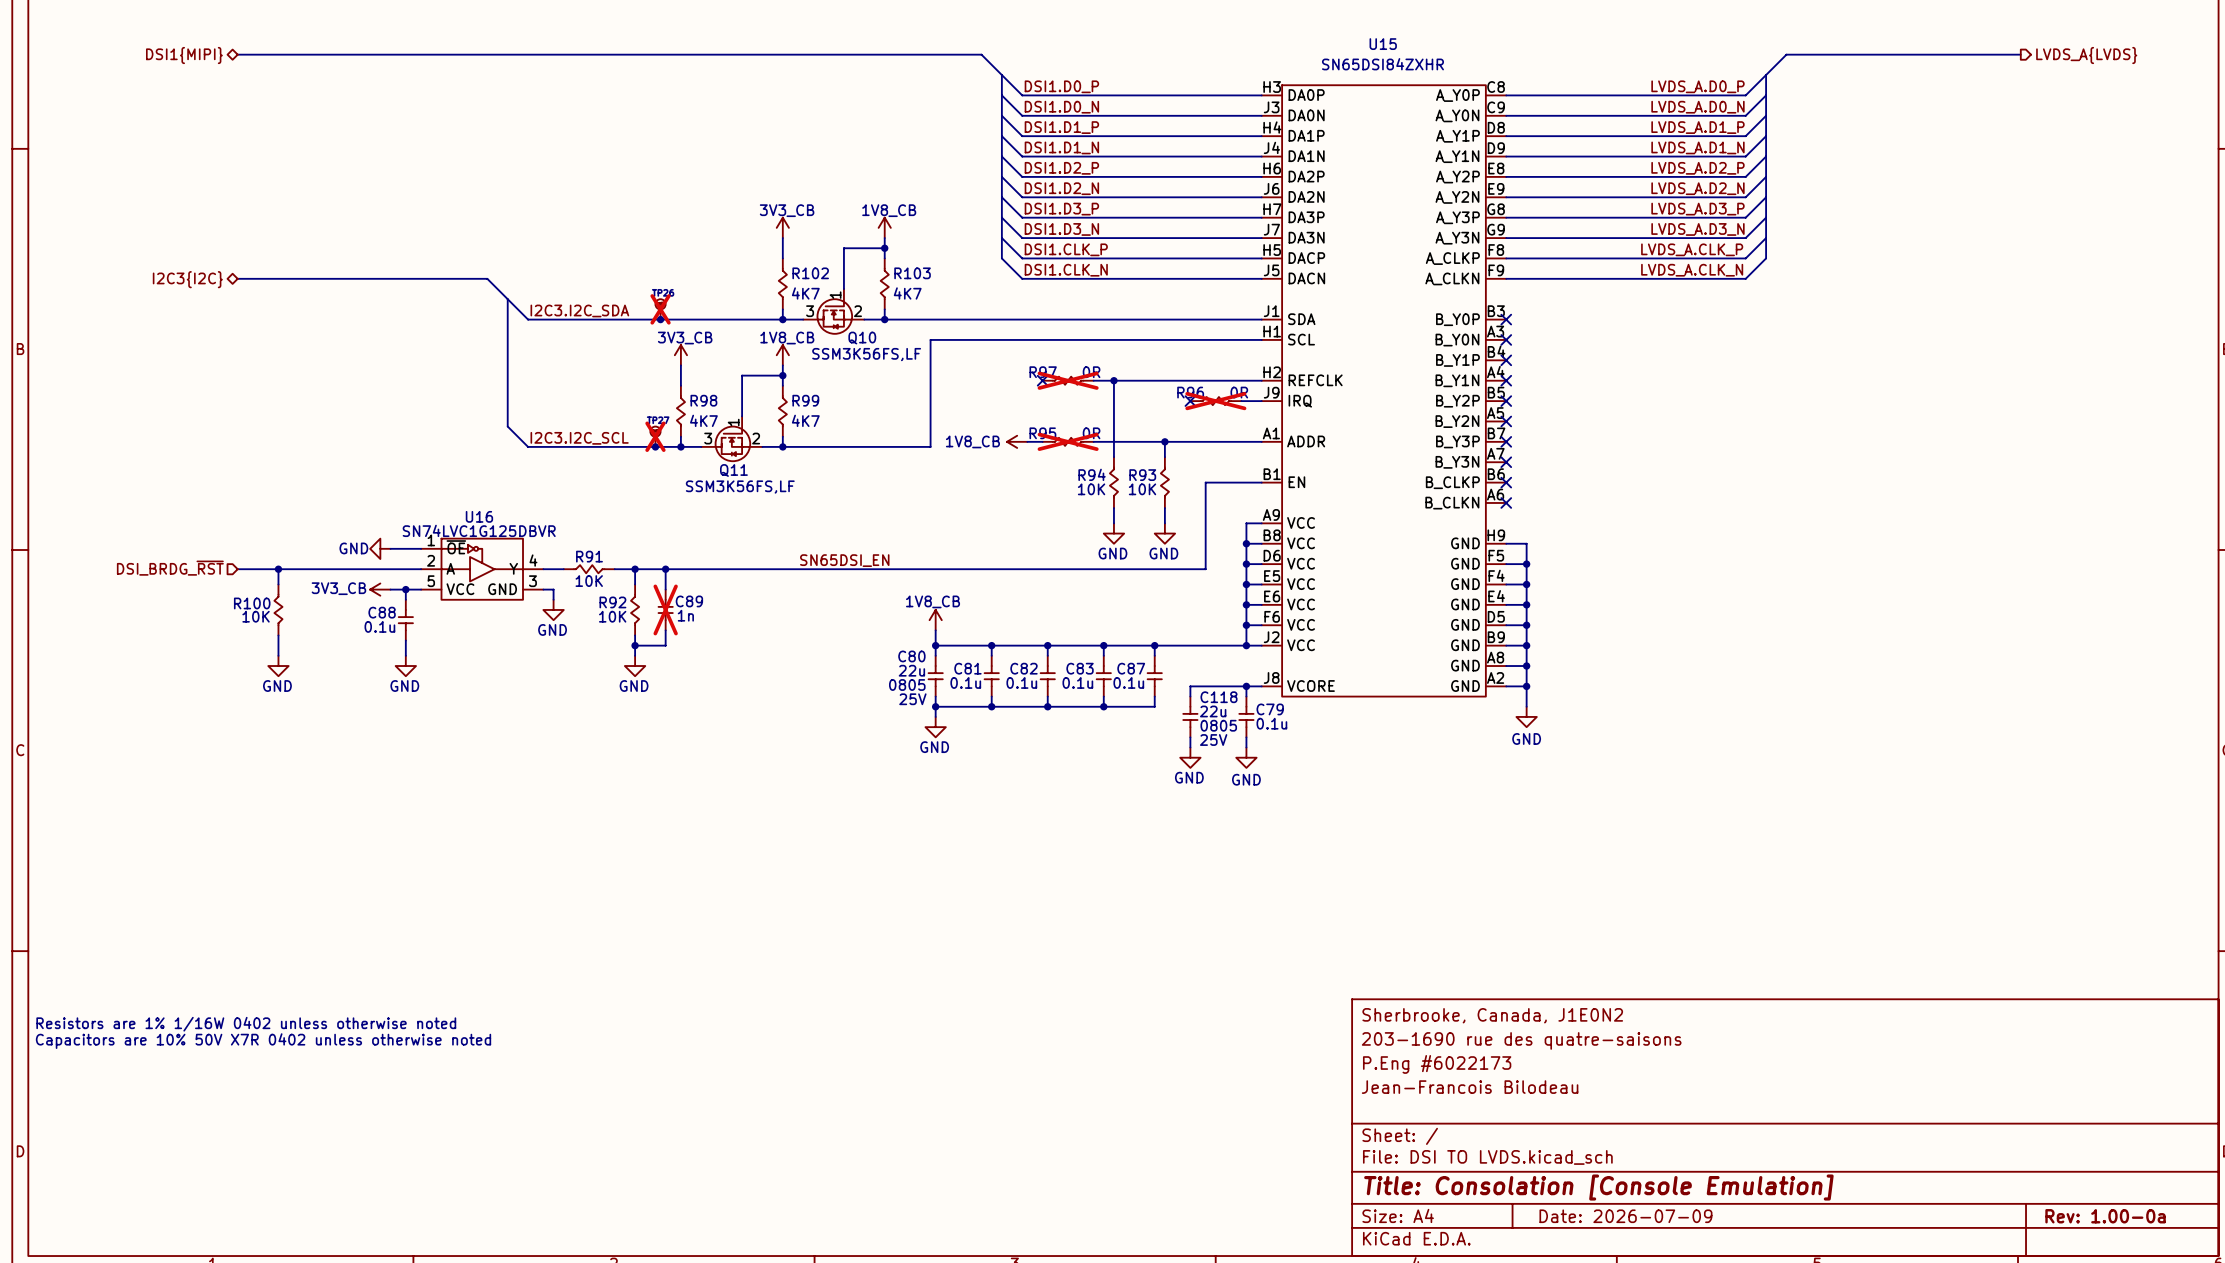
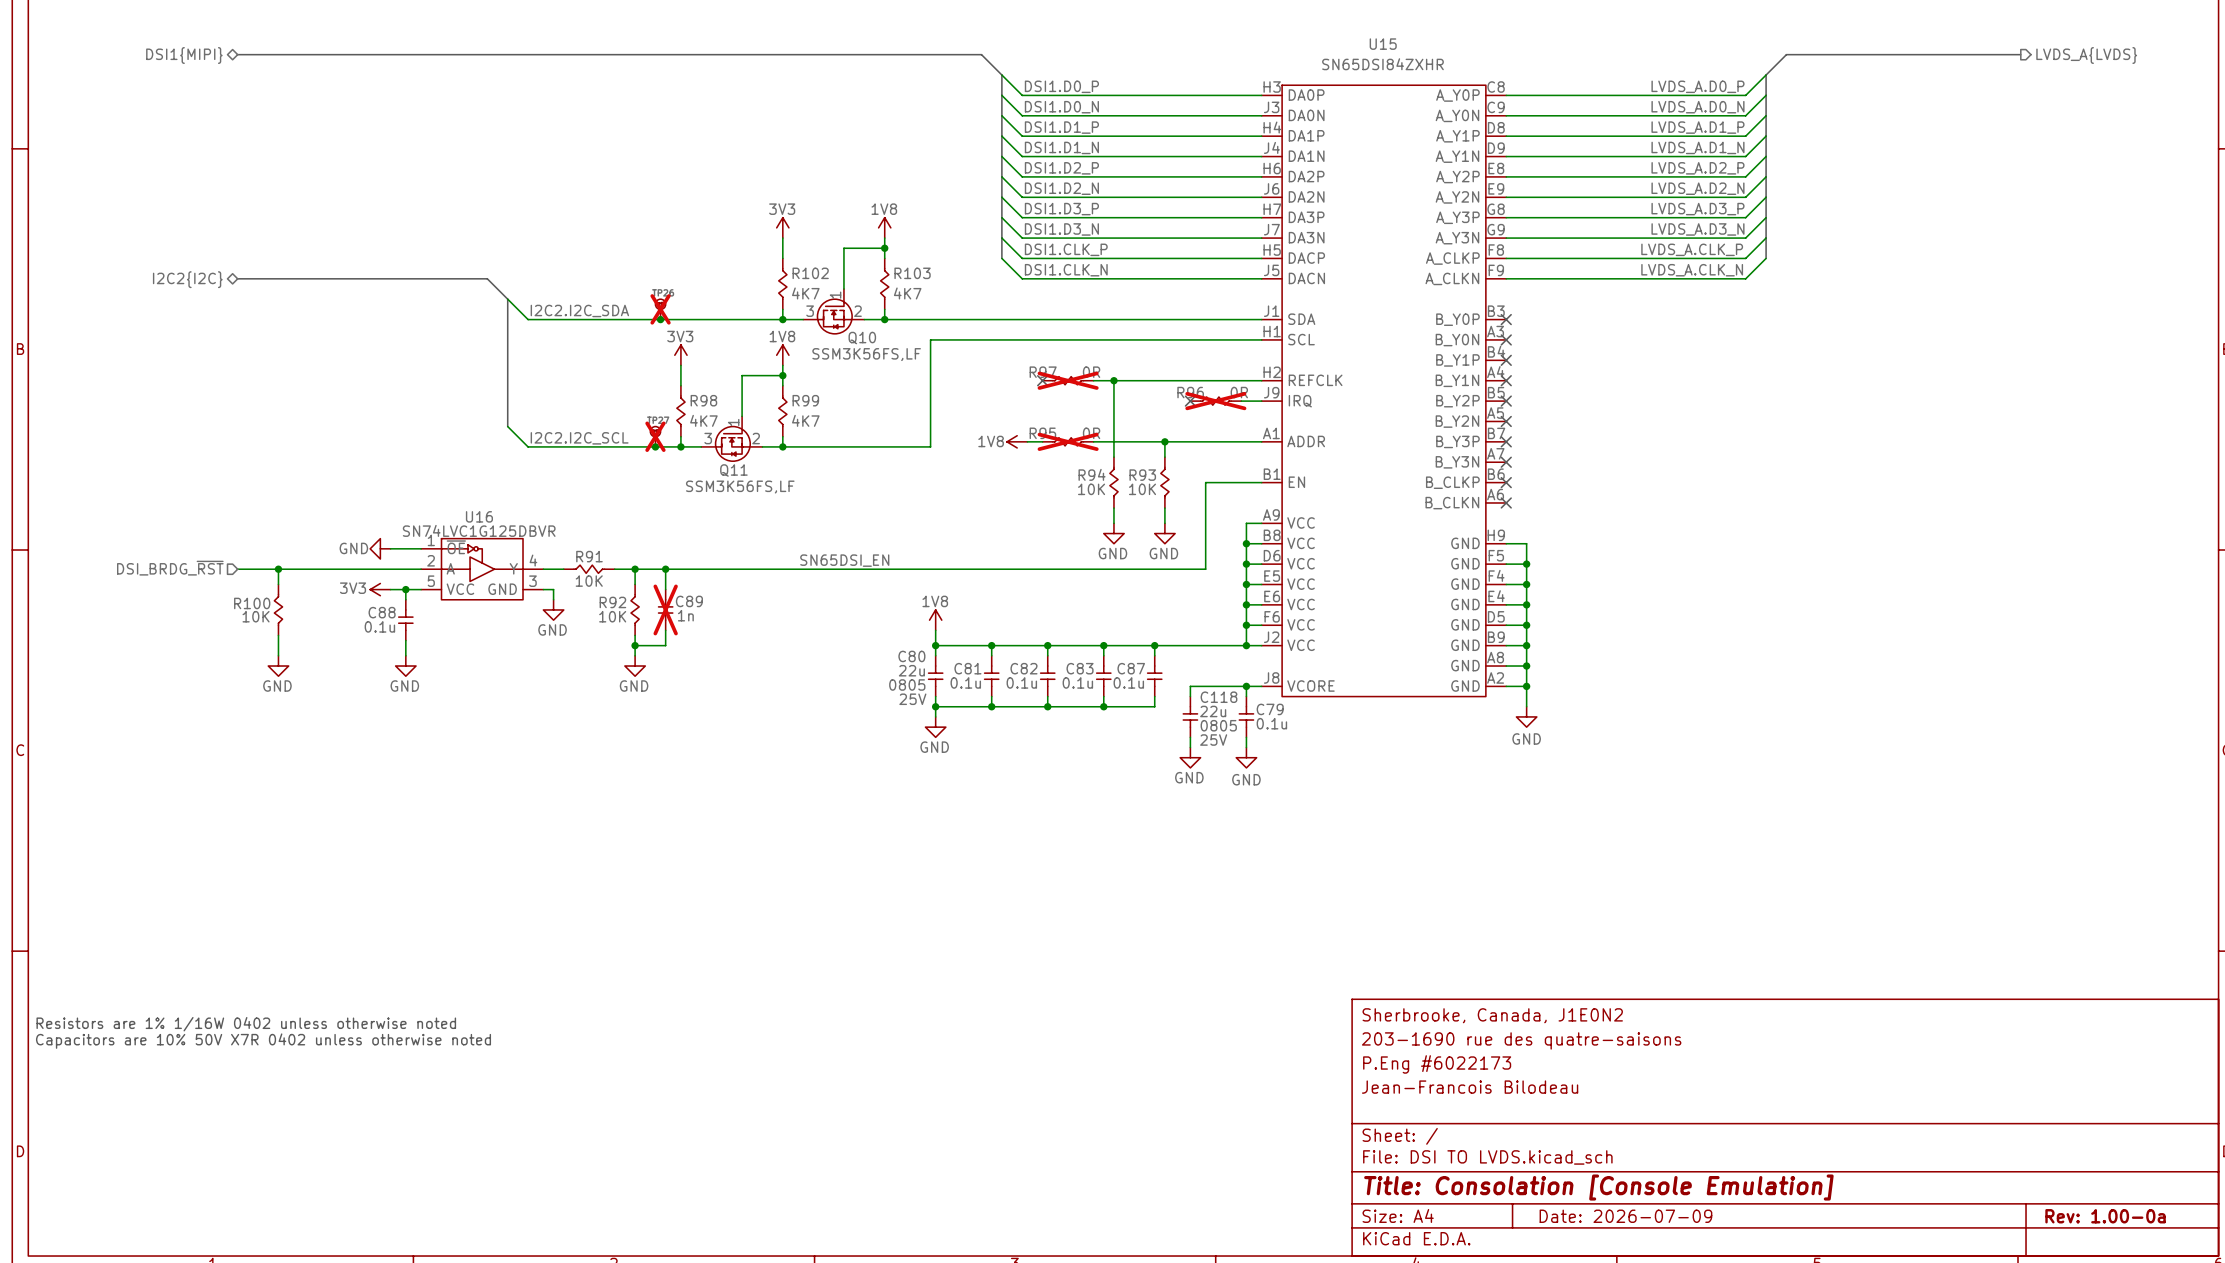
power symbol: 3V3_CB (782, 227) -> 3V3 (782, 227)
power symbol: 1V8_CB (884, 227) -> 1V8 (884, 227)
hierarchical label: I2C3{I2C} (187, 279) -> I2C2{I2C} (187, 279)
label: I2C3.I2C_SDA (579, 310) -> I2C2.I2C_SDA (579, 310)
power symbol: 3V3_CB (680, 355) -> 3V3 (680, 355)
power symbol: 1V8_CB (782, 355) -> 1V8 (782, 355)
label: I2C3.I2C_SCL (579, 438) -> I2C2.I2C_SCL (579, 438)
power symbol: 1V8_CB (1017, 441) -> 1V8 (1017, 441)
power symbol: 3V3_CB (380, 589) -> 3V3 (380, 589)
power symbol: 1V8_CB (935, 620) -> 1V8 (935, 620)

